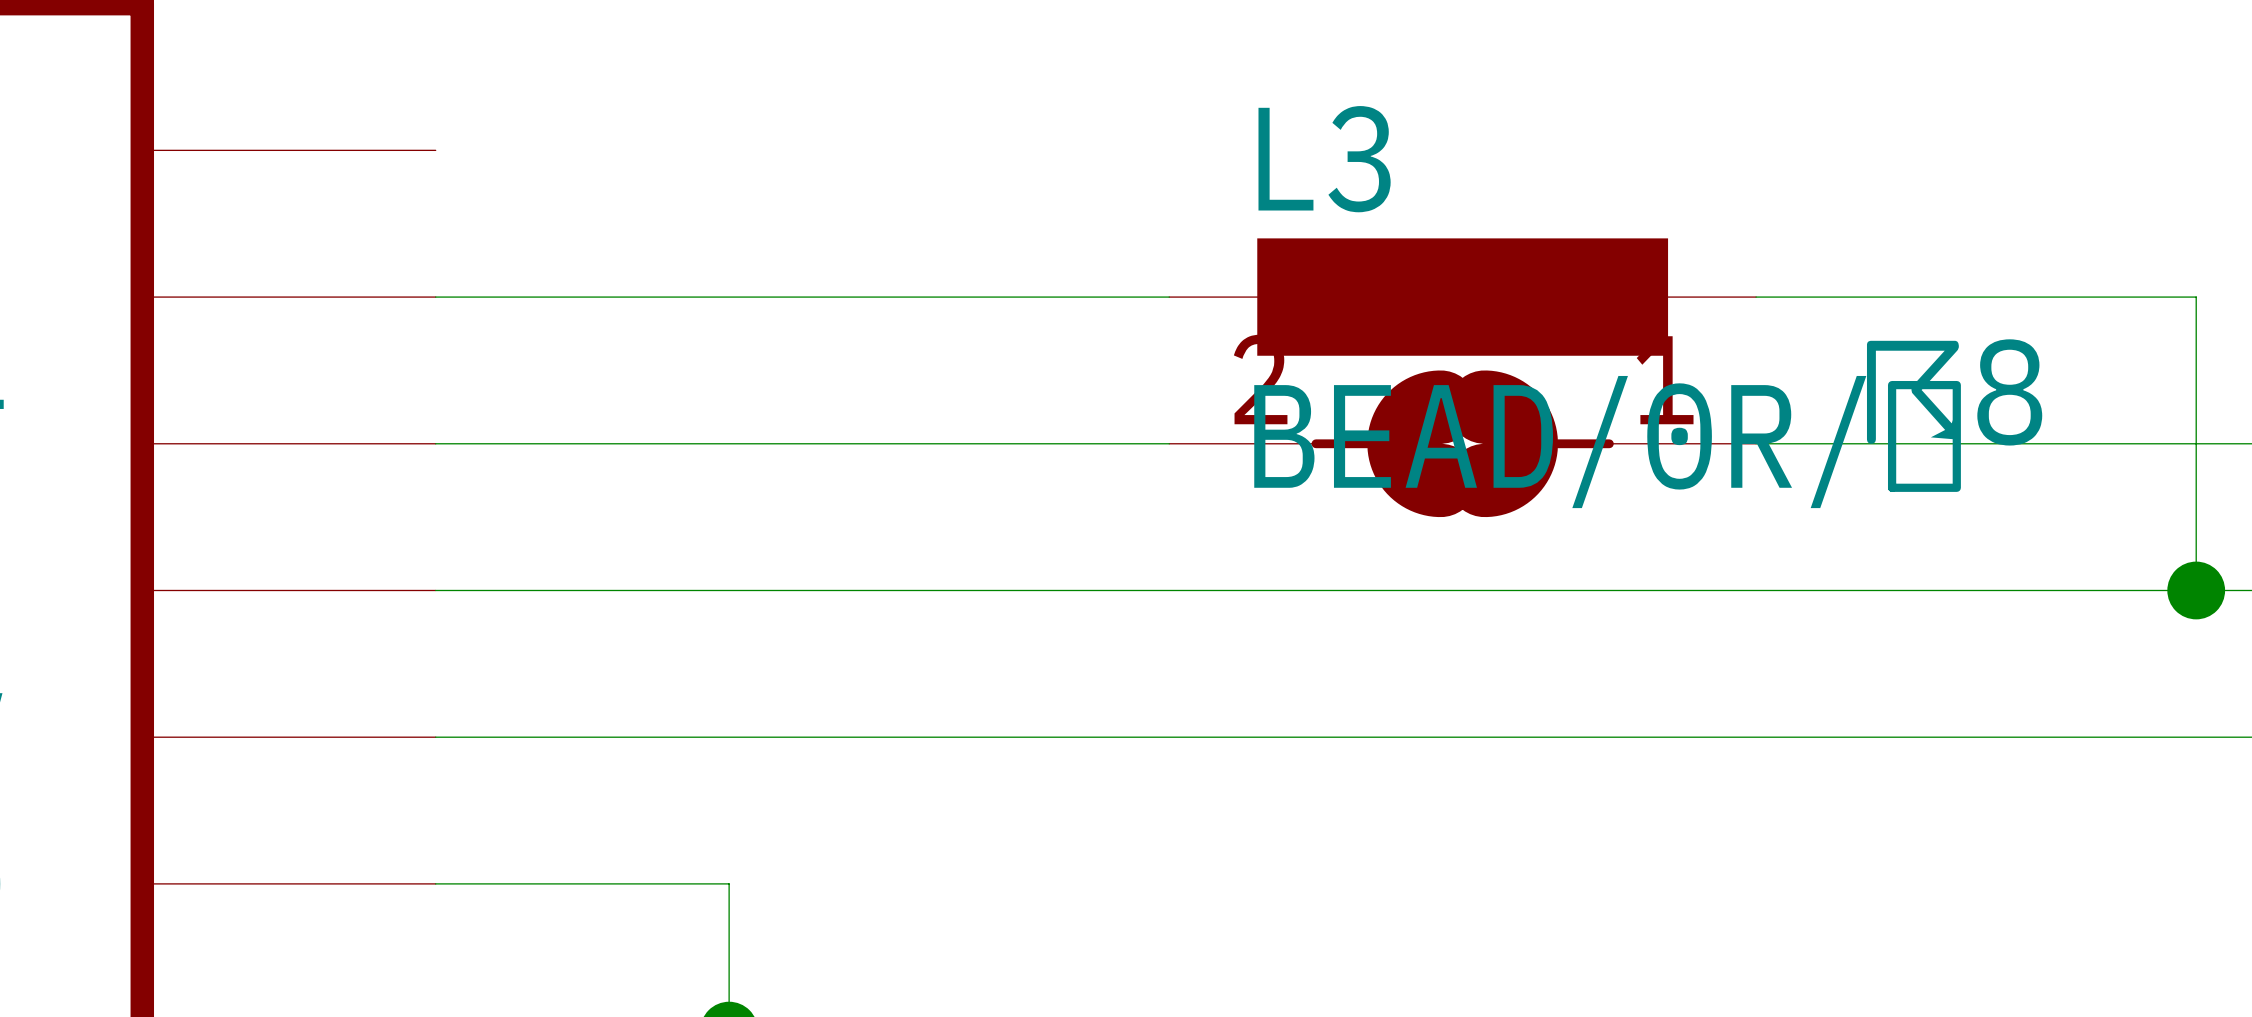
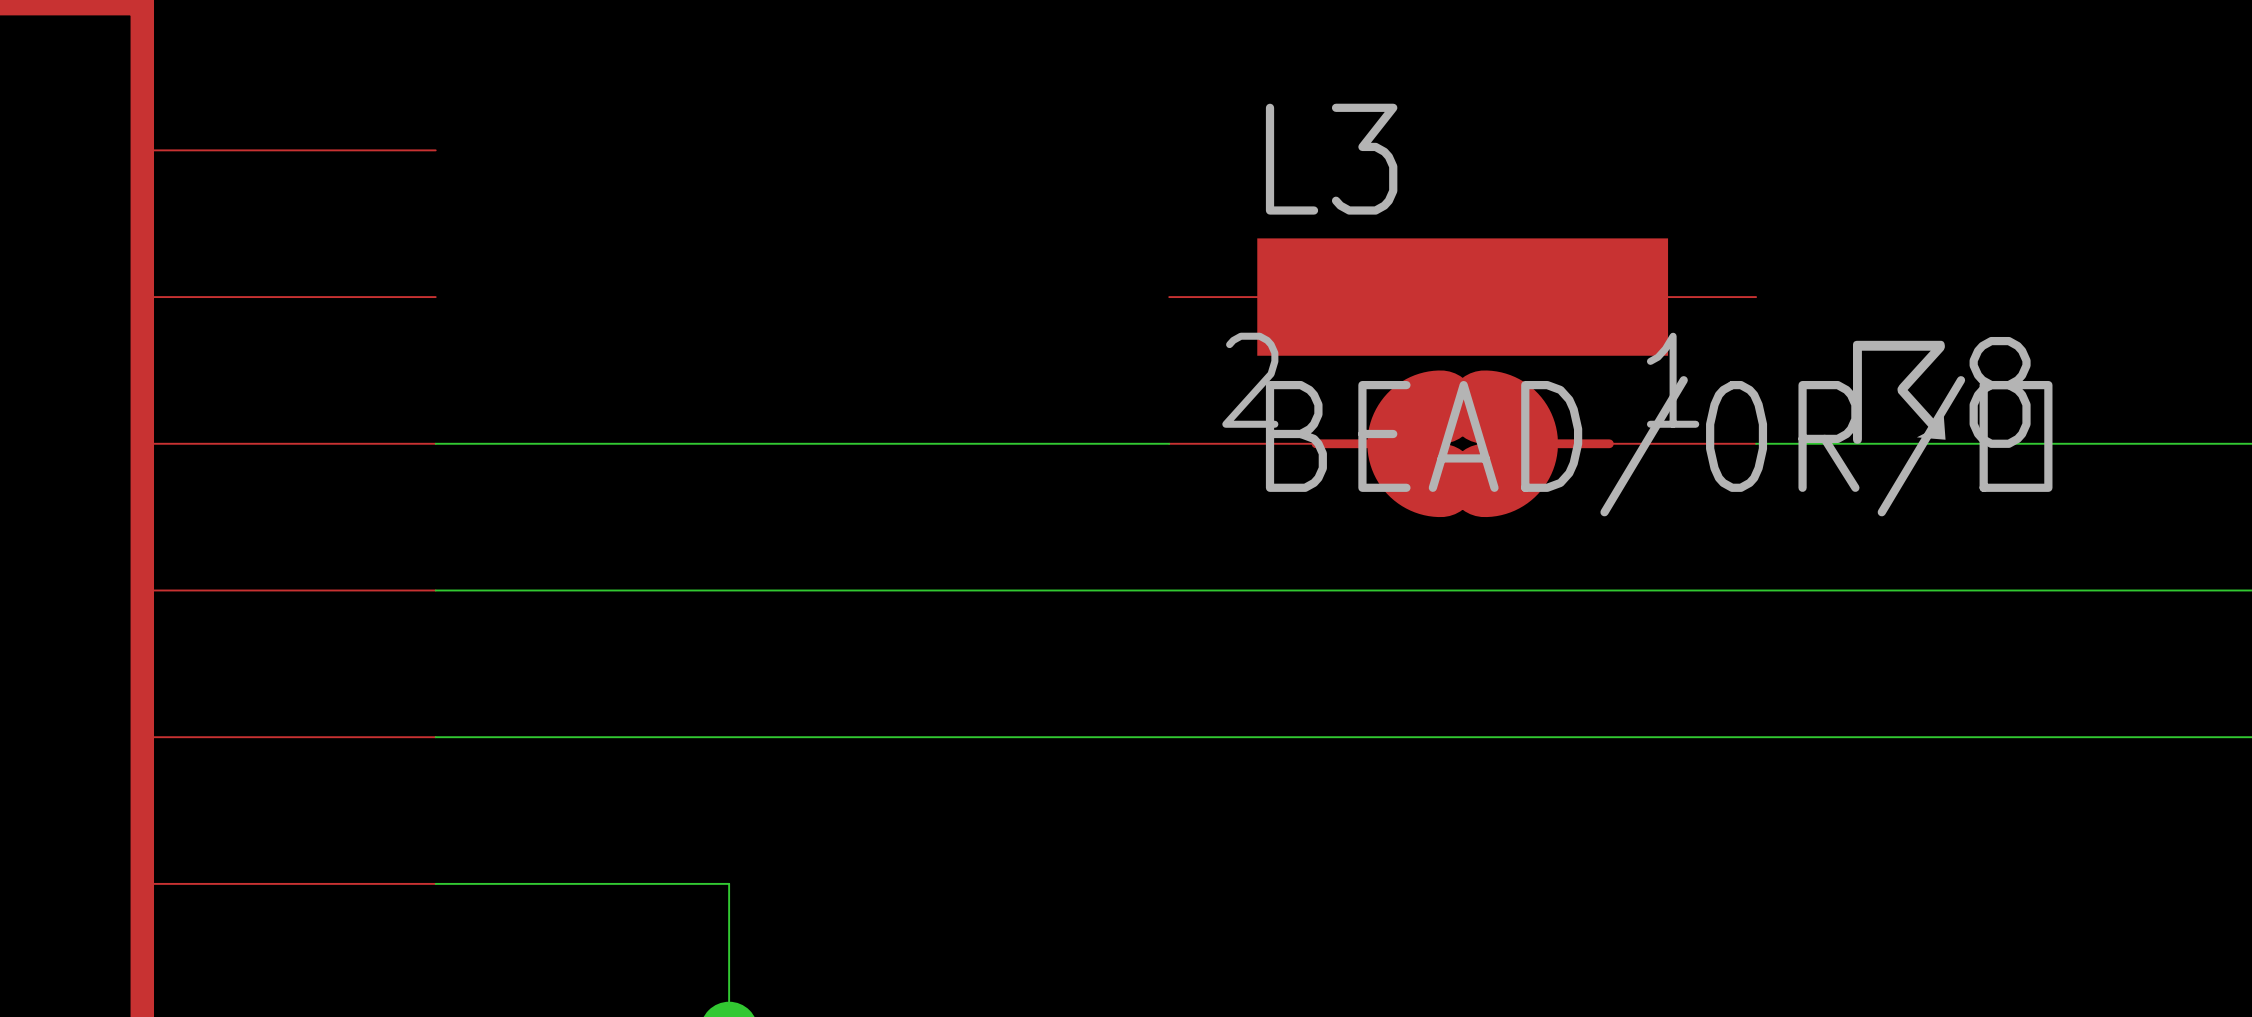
wire: (435, 297) (1169, 297) -> none
wire: (1756, 297) (2196, 297) (2196, 590) -> none
junction: (2196, 590) -> none

